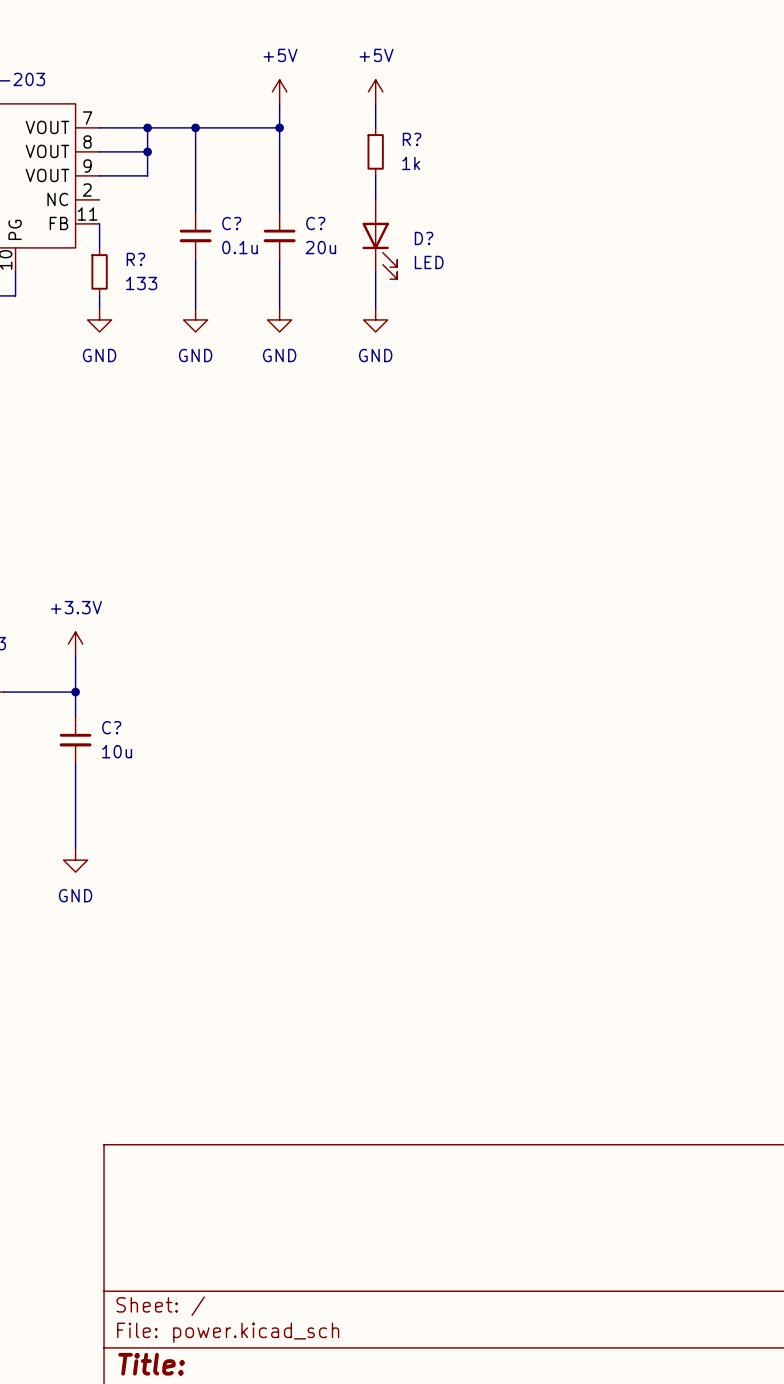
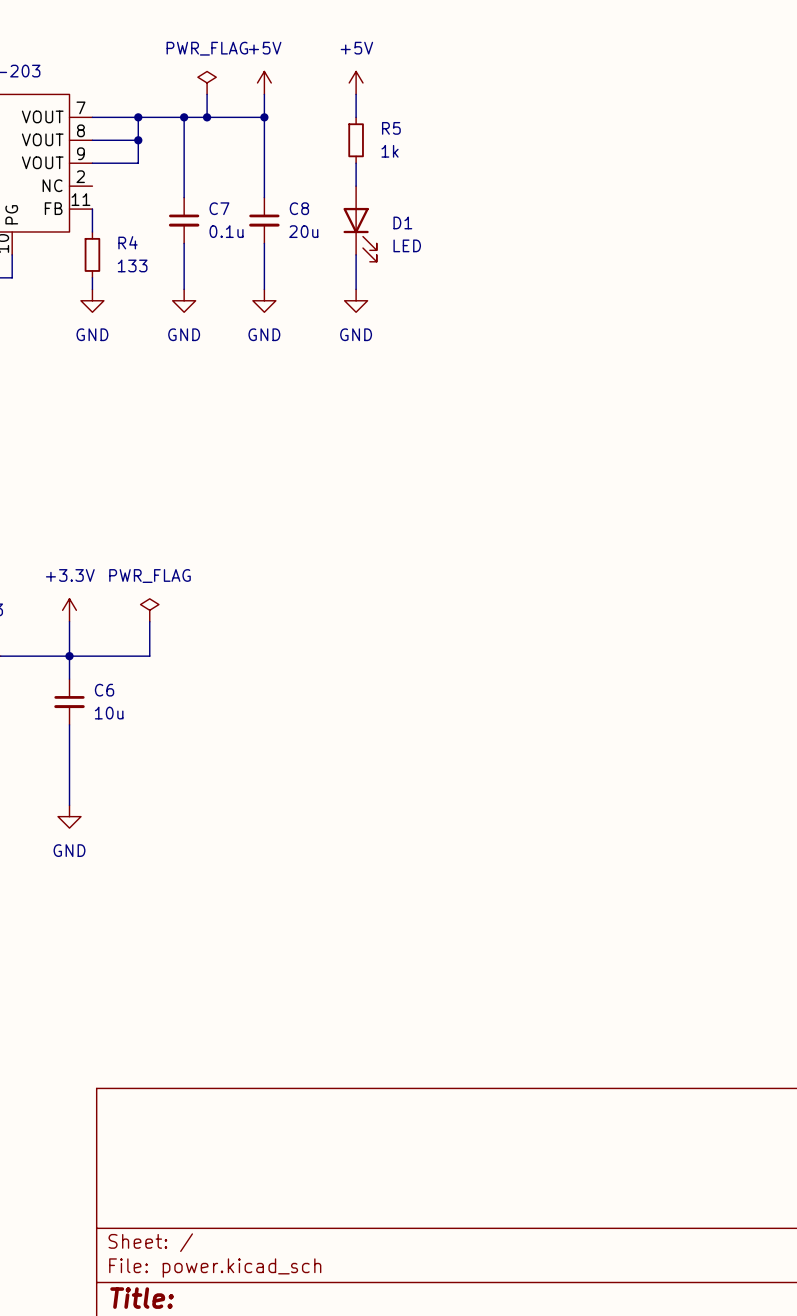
power symbol: none -> PWR_FLAG (207, 82)
wire: none -> (207, 94) (207, 117)
junction: none -> (207, 117)
R? name: R? (412, 139) -> R5 (391, 128)
C? name: C? (231, 223) -> C7 (219, 208)
C? name: C? (315, 223) -> C8 (299, 208)
D? name: D? (424, 238) -> D1 (402, 222)
R? name: R? (135, 259) -> R4 (128, 242)
power symbol: none -> PWR_FLAG (149, 610)
wire: none -> (149, 621) (149, 656) (69, 656)
C? name: C? (111, 727) -> C6 (104, 690)

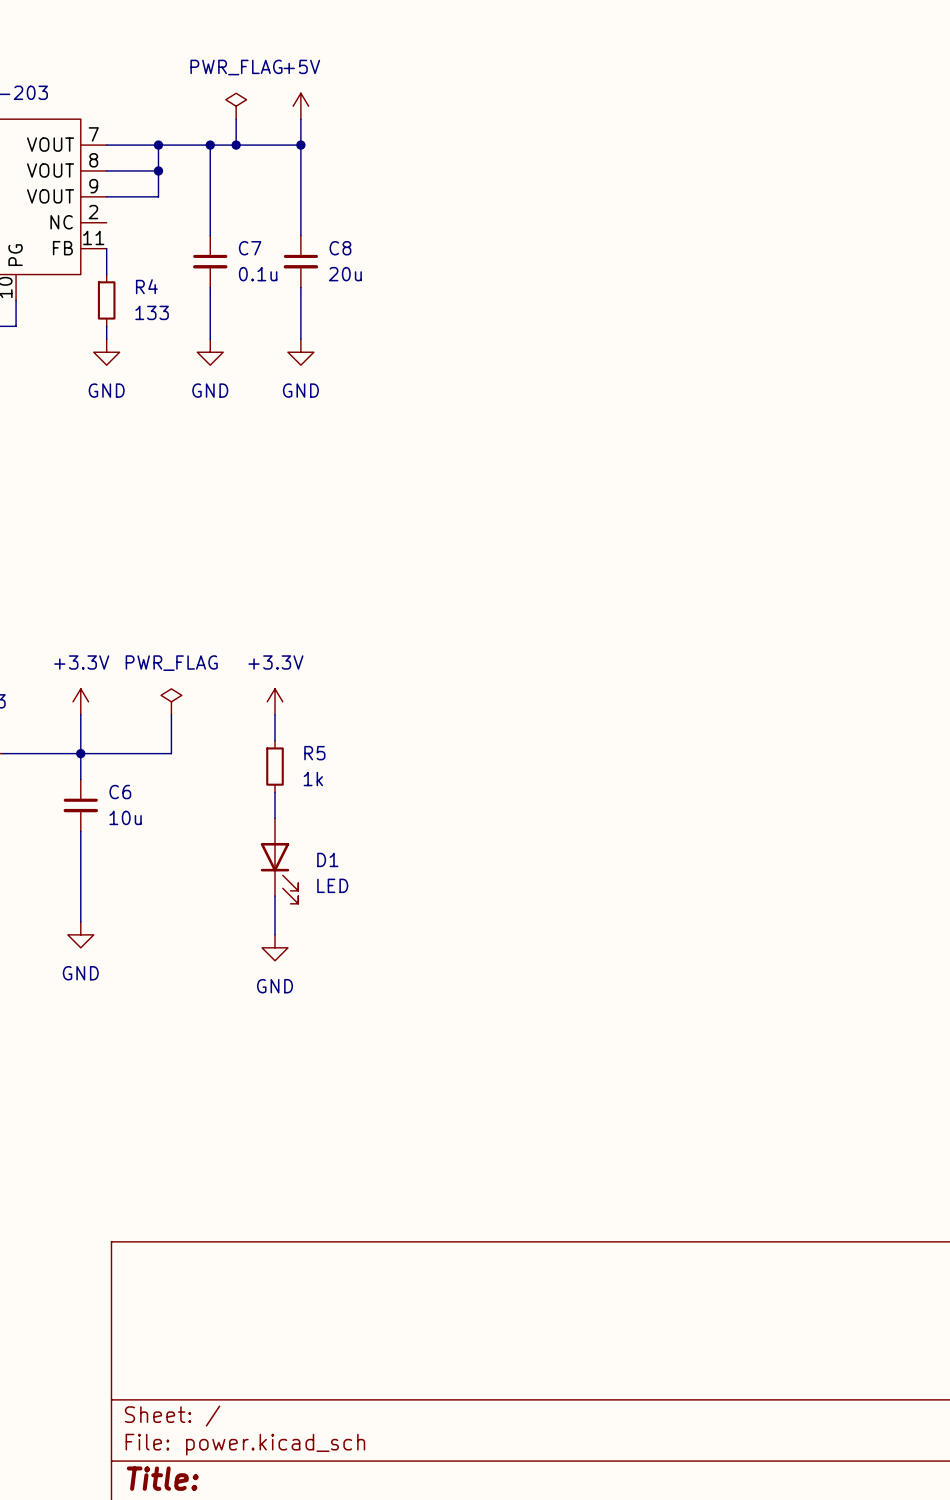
power symbol: +5V (356, 82) -> none
wire: (356, 94) (356, 117) -> none
R5 position: (356, 140) -> (275, 766)
wire: (356, 163) (356, 186) -> none
D1 position: (360, 223) -> (279, 861)
wire: (356, 254) (356, 289) -> none
power symbol: GND (356, 300) -> none
power symbol: none -> +3.3V (275, 701)
wire: none -> (275, 714) (275, 740)
wire: none -> (275, 792) (275, 818)
wire: none -> (275, 896) (275, 934)
power symbol: none -> GND (275, 947)

